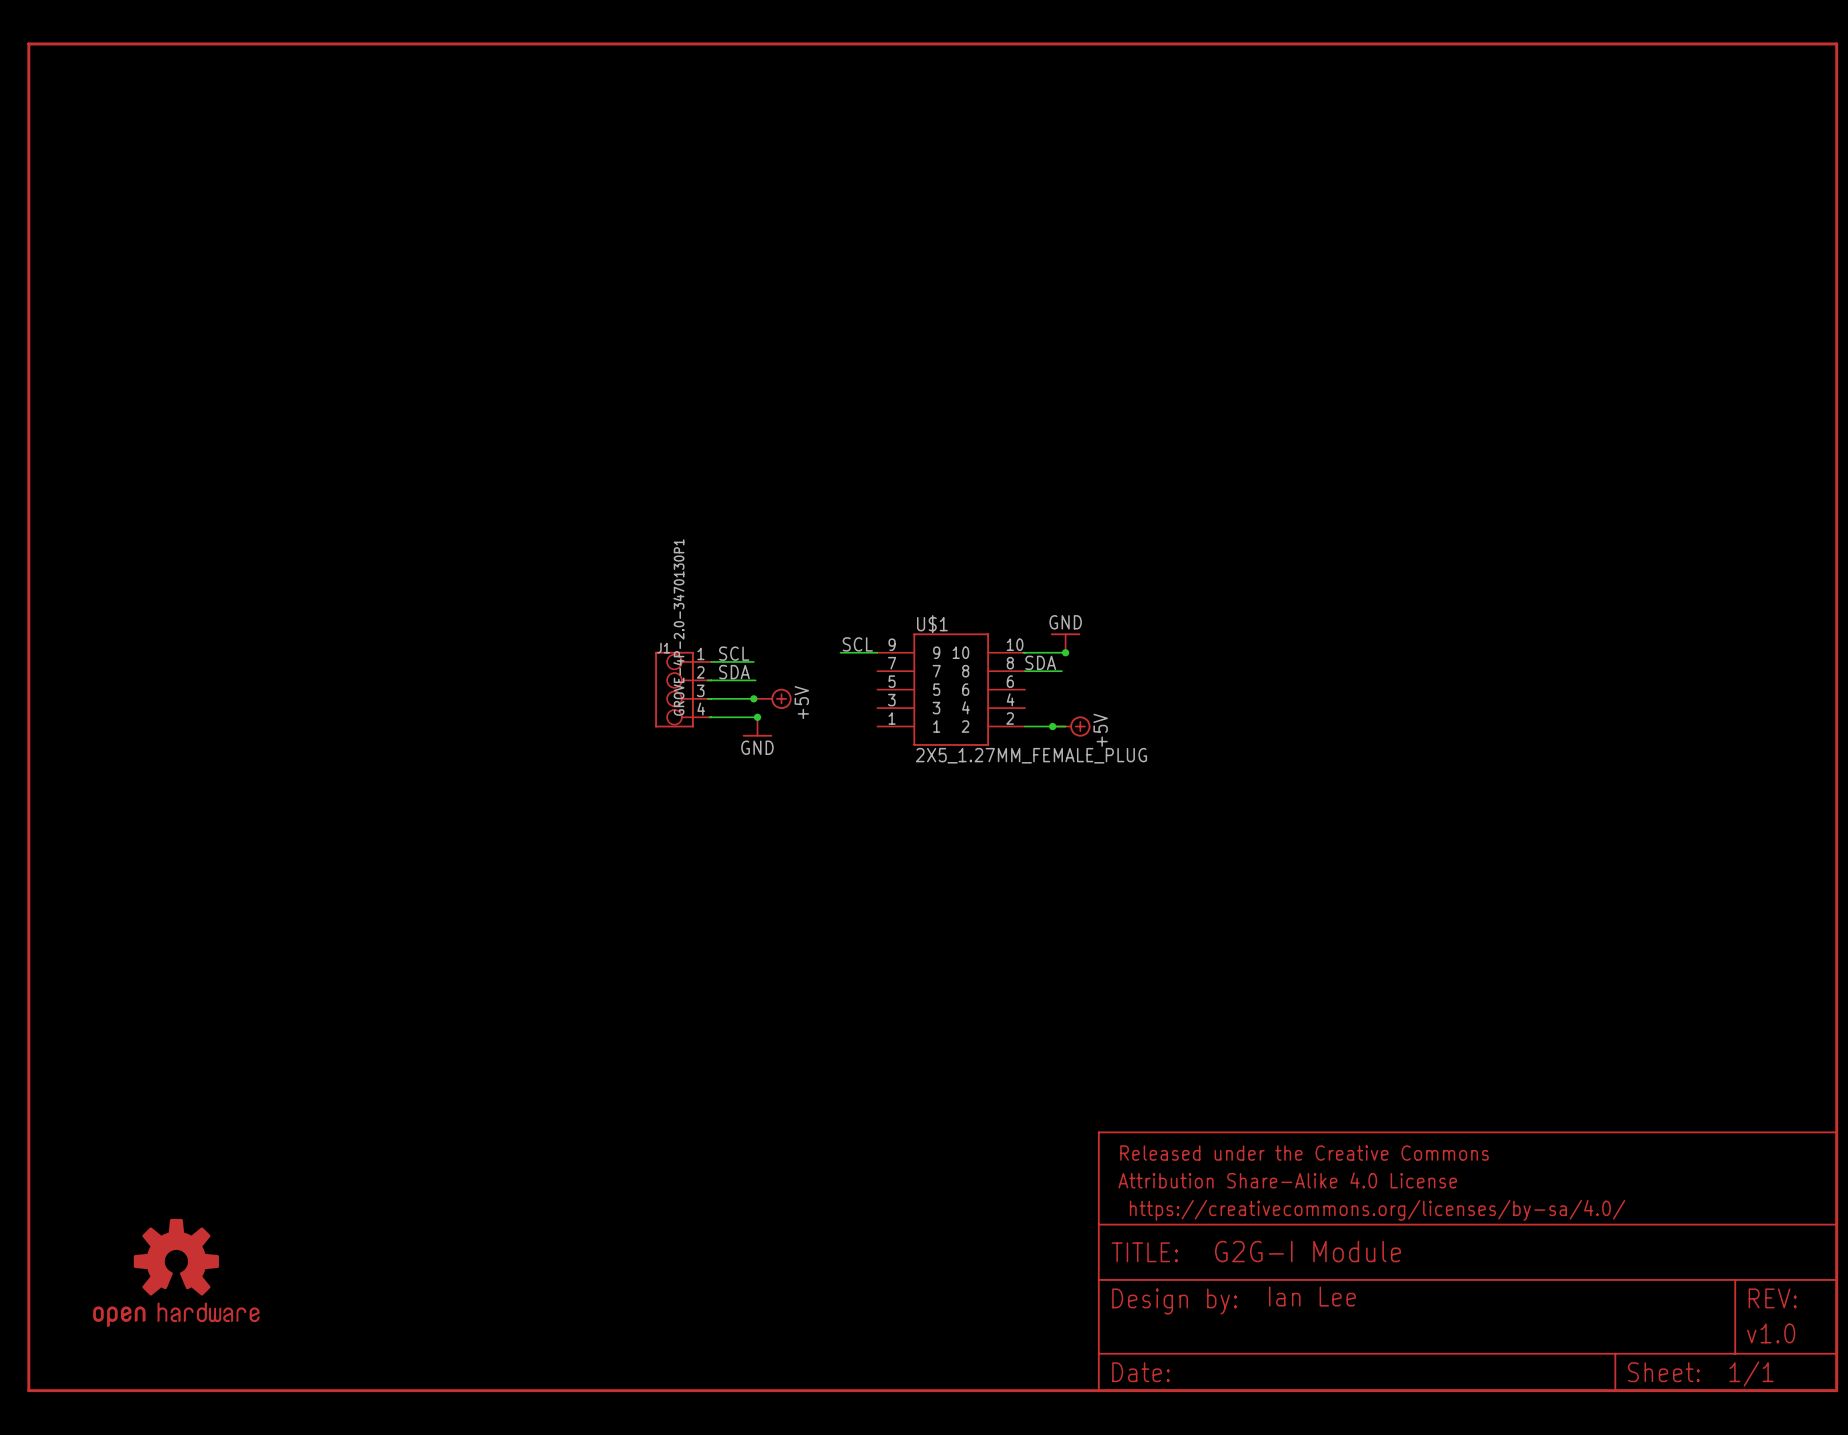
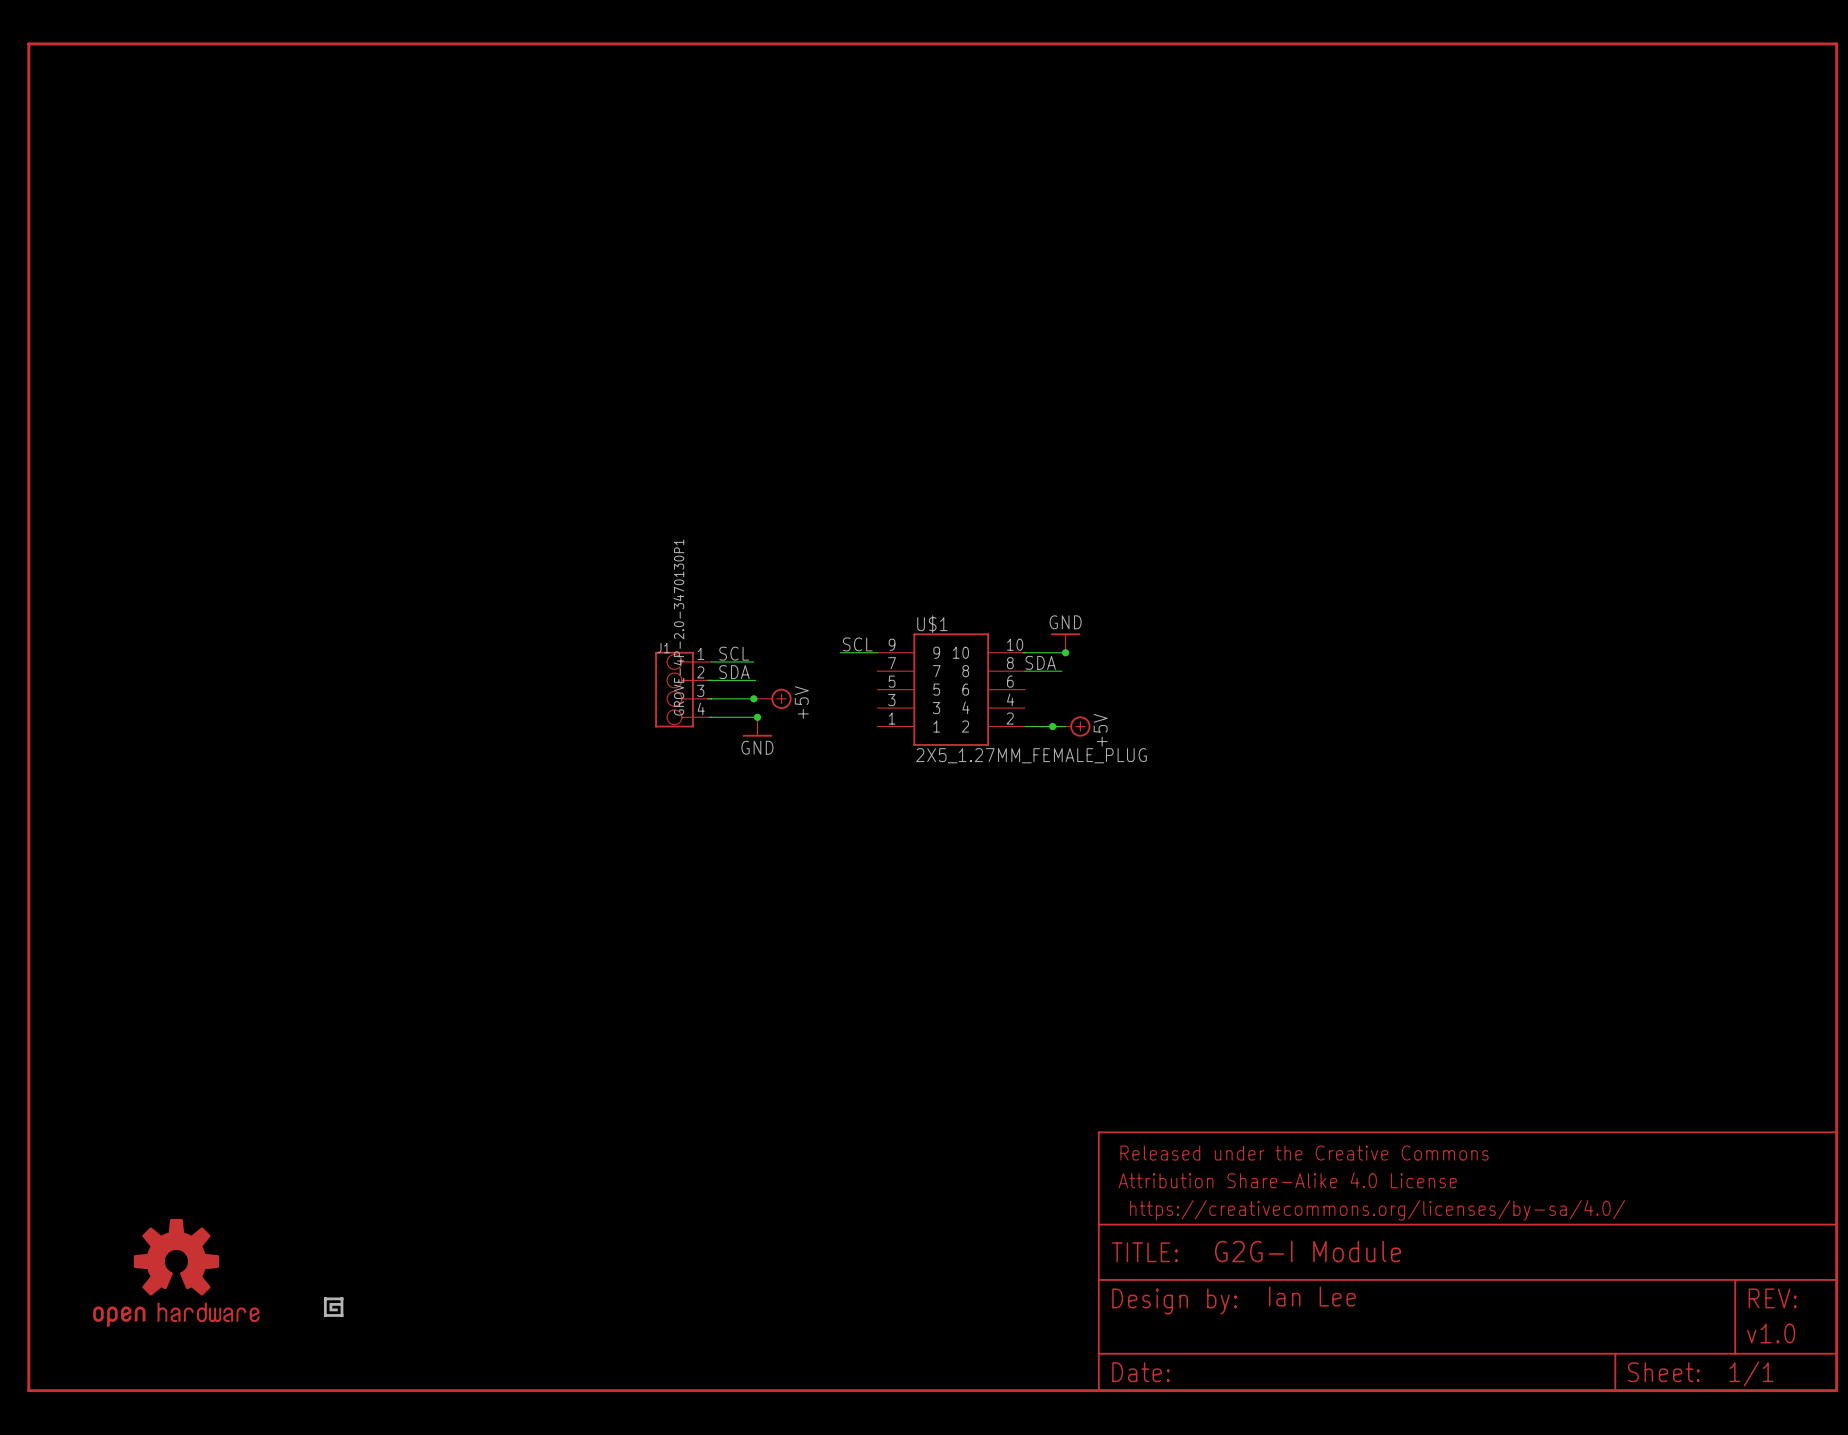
part: none -> (333, 1307)

